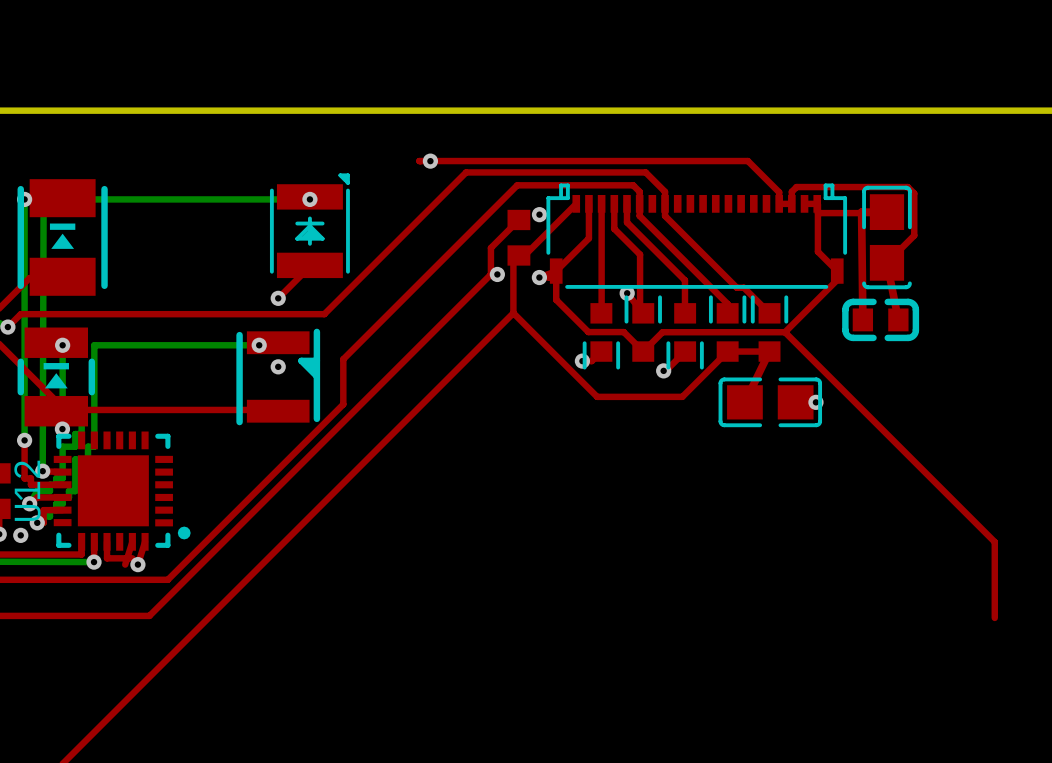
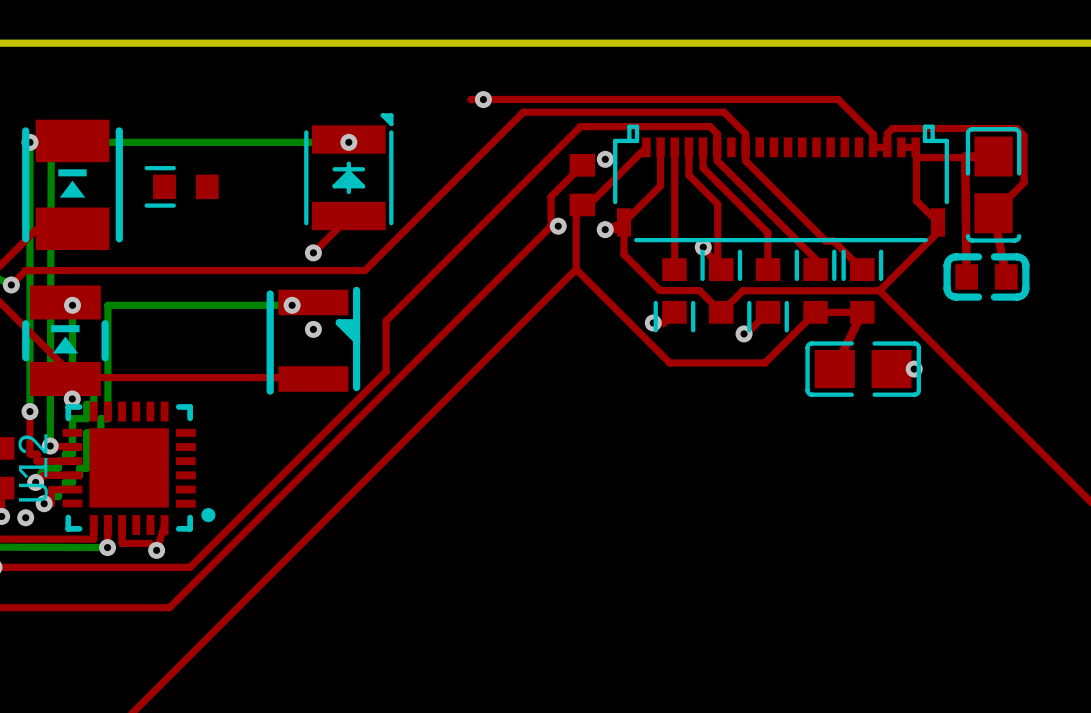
part: none -> (181, 186)
top track: (132, 541) (125, 564) -> none

